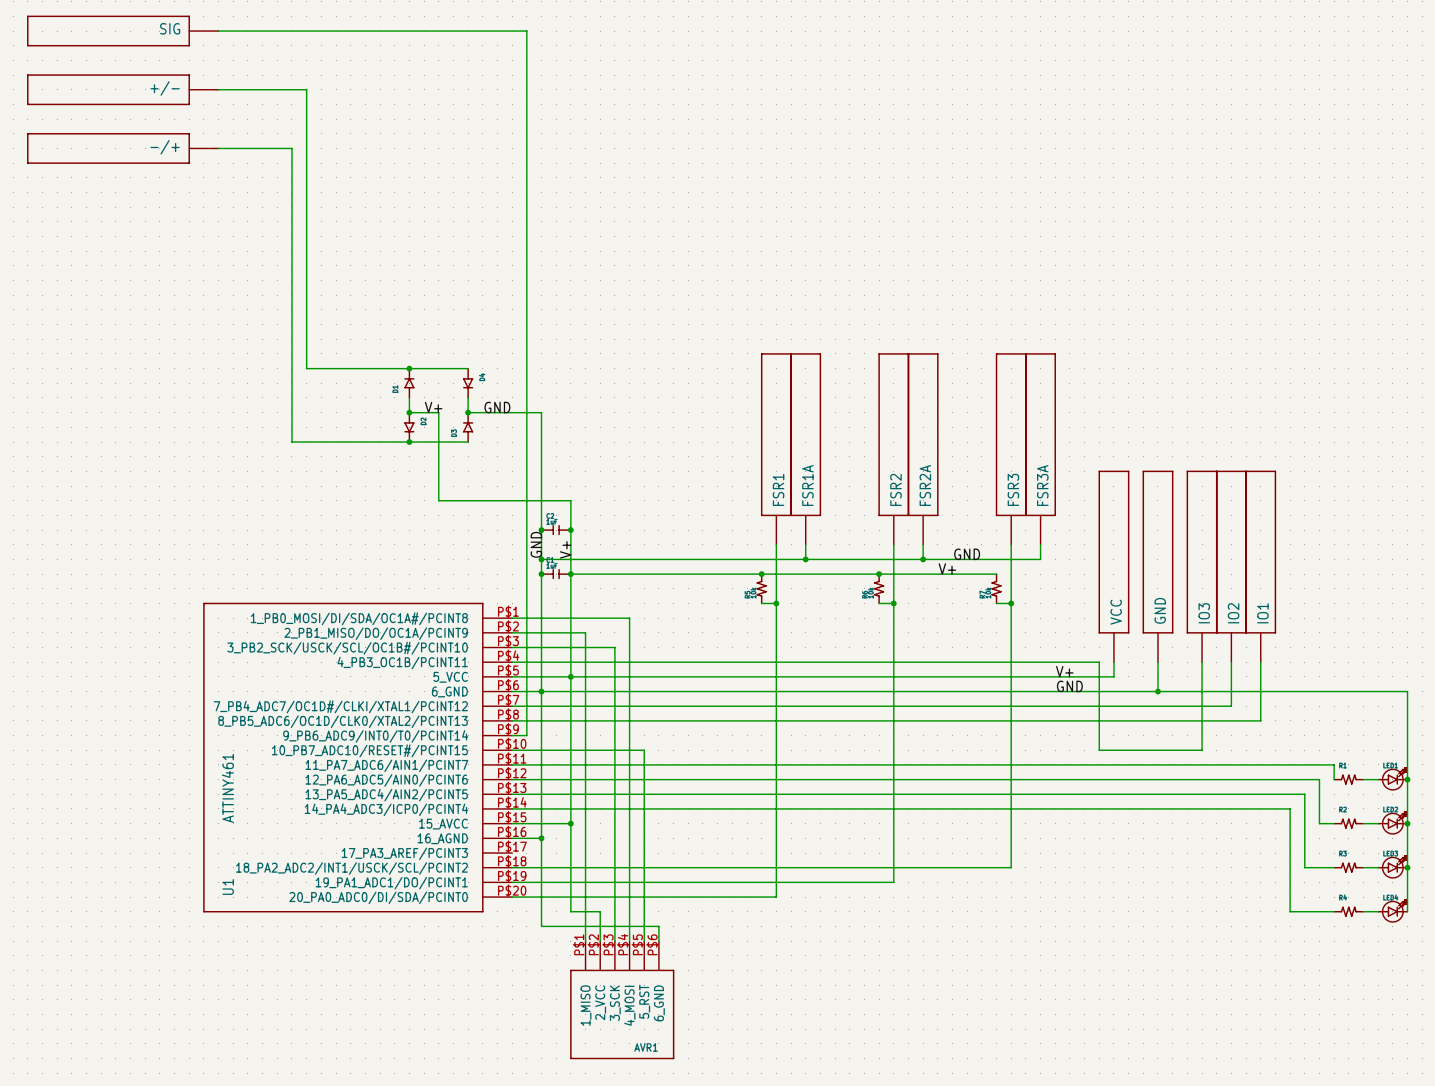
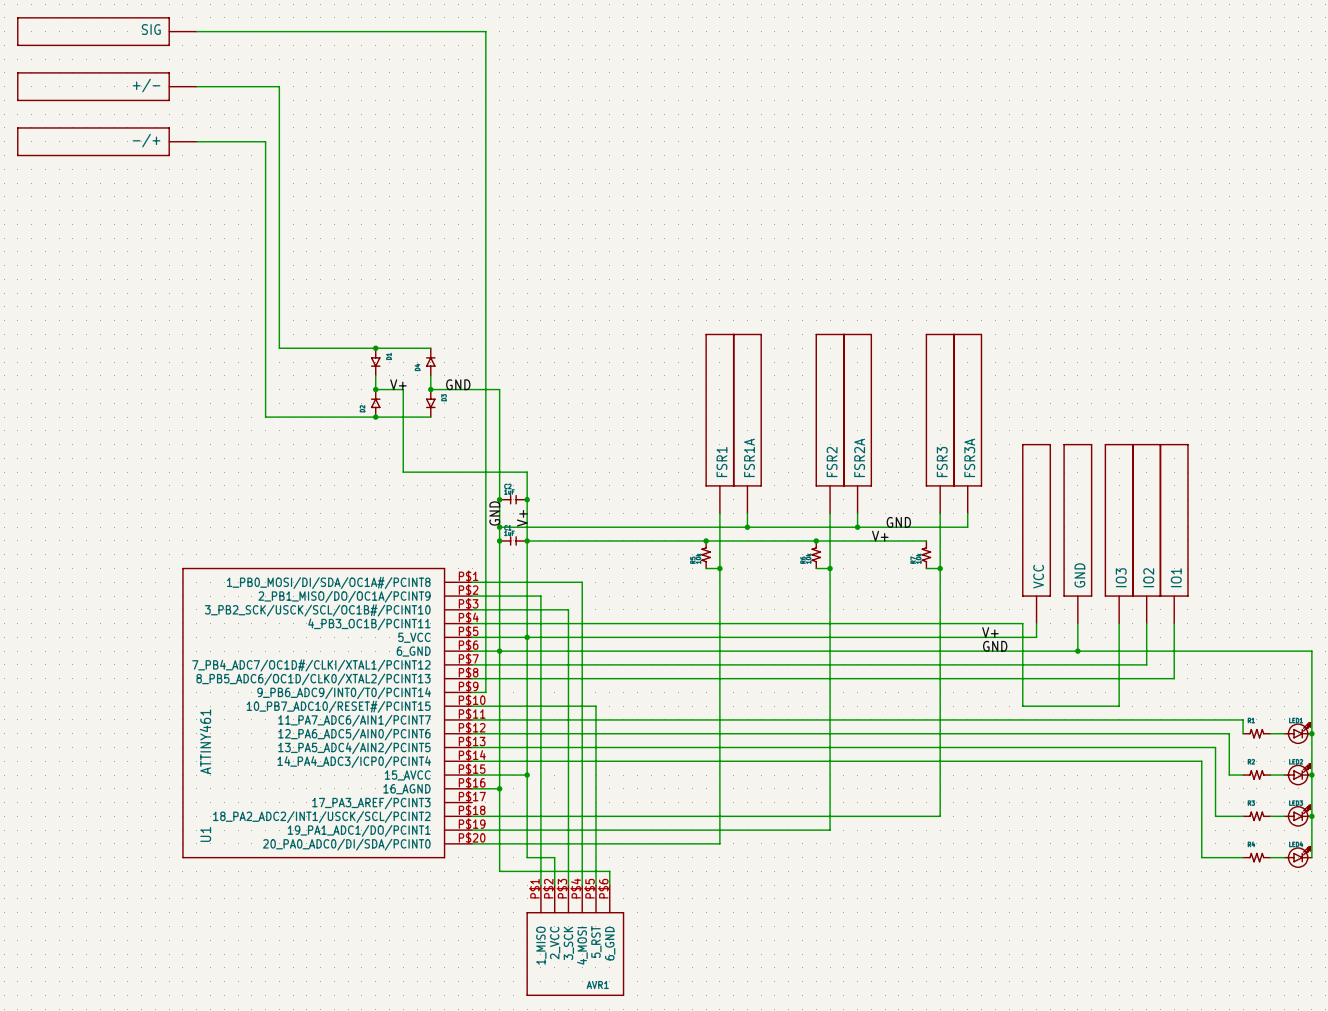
part rotation: 0° (409, 383) -> 180° (375, 362)
part rotation: 0° (468, 383) -> 180° (430, 362)
part rotation: 0° (409, 427) -> 180° (375, 403)
part rotation: 0° (468, 427) -> 180° (430, 403)

